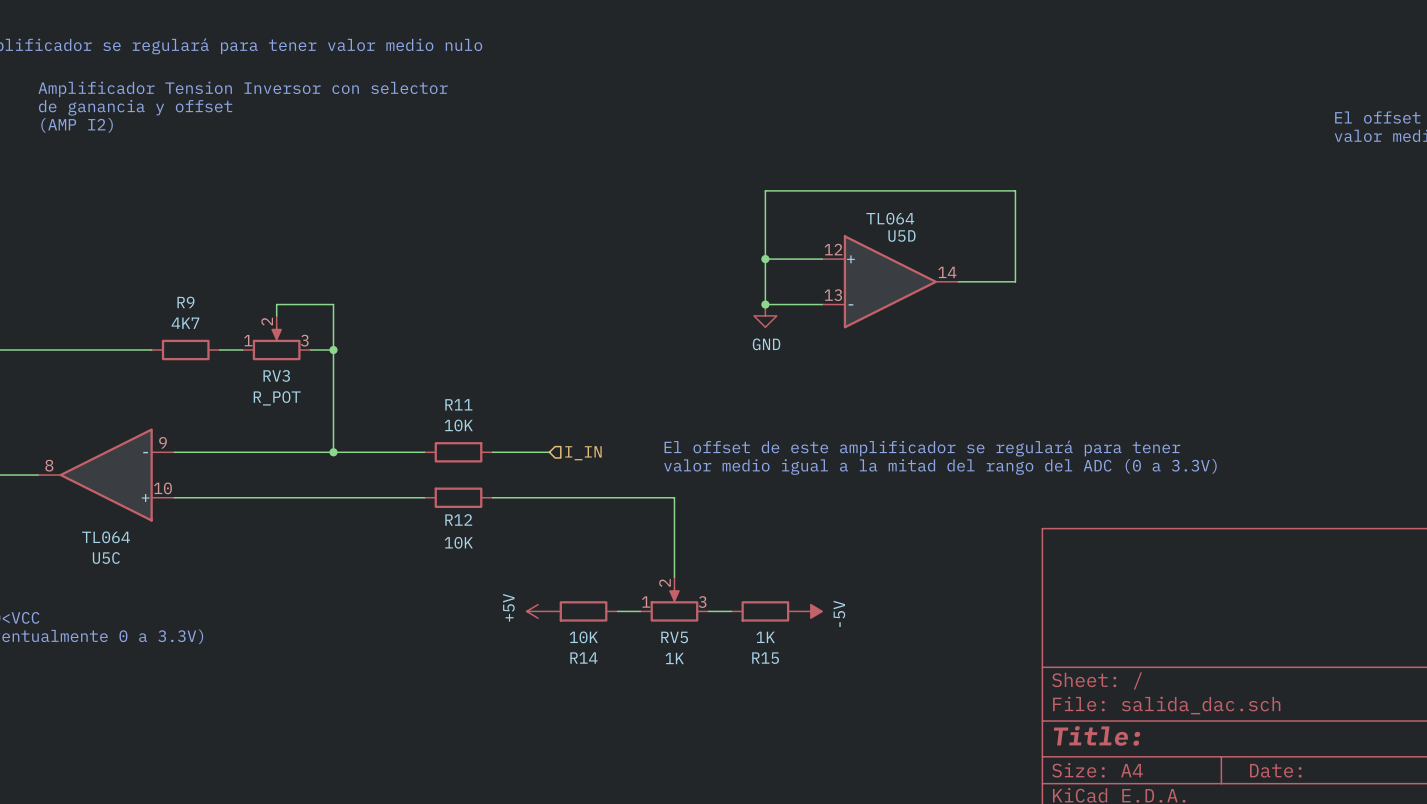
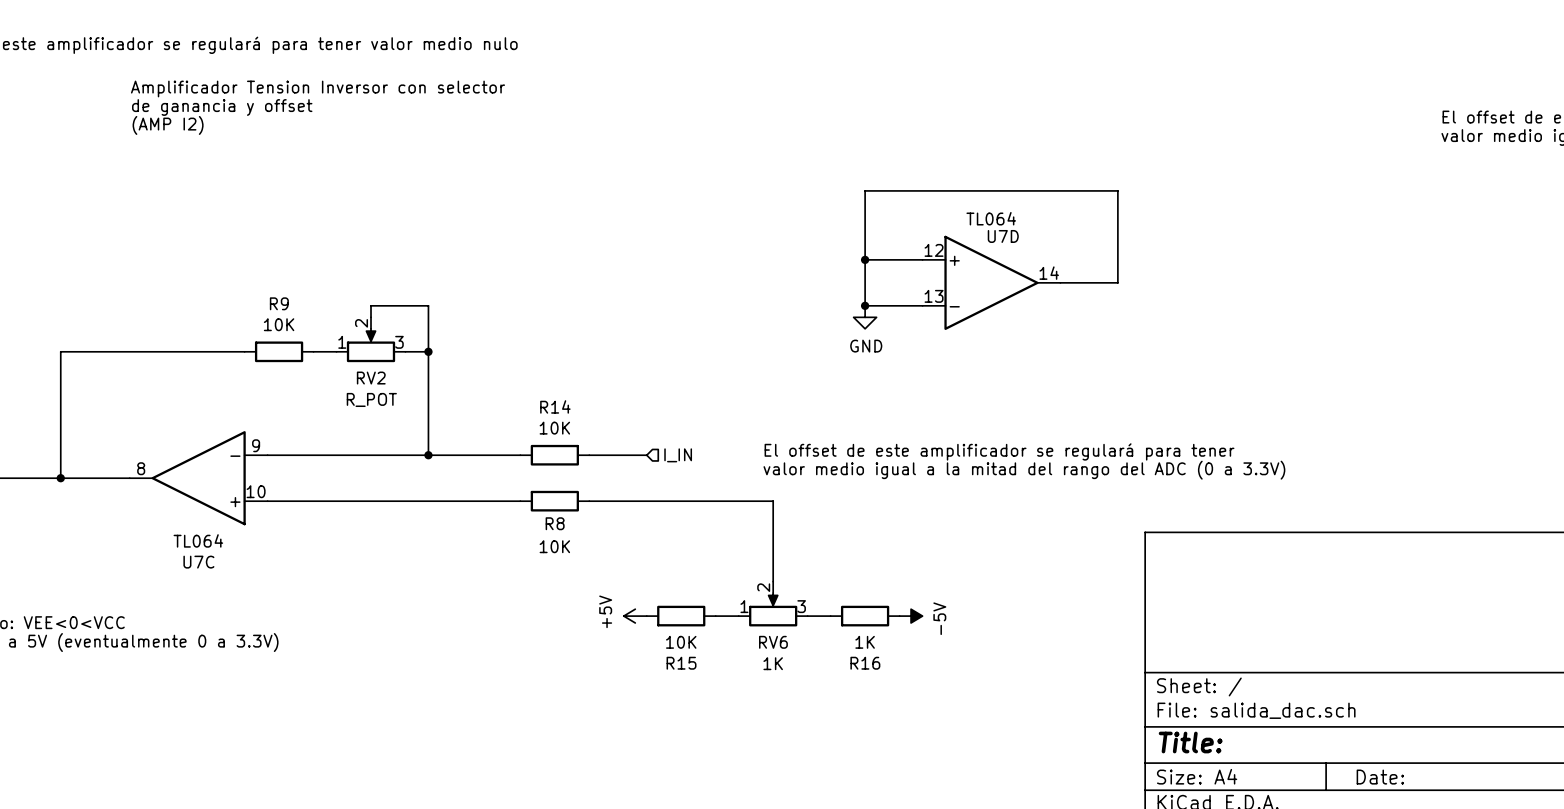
U5D name: U5D (901, 236) -> U7D (1003, 236)
R9 value: 4K7 (185, 323) -> 10K (279, 324)
RV3 name: RV3 (276, 375) -> RV2 (371, 378)
R11 name: R11 (458, 404) -> R14 (555, 406)
R12 name: R12 (458, 519) -> R8 (555, 523)
U5C name: U5C (106, 558) -> U7C (198, 562)
RV5 name: RV5 (674, 637) -> RV6 (773, 642)
R14 name: R14 (583, 658) -> R15 (681, 663)
R15 name: R15 (765, 658) -> R16 (865, 663)

